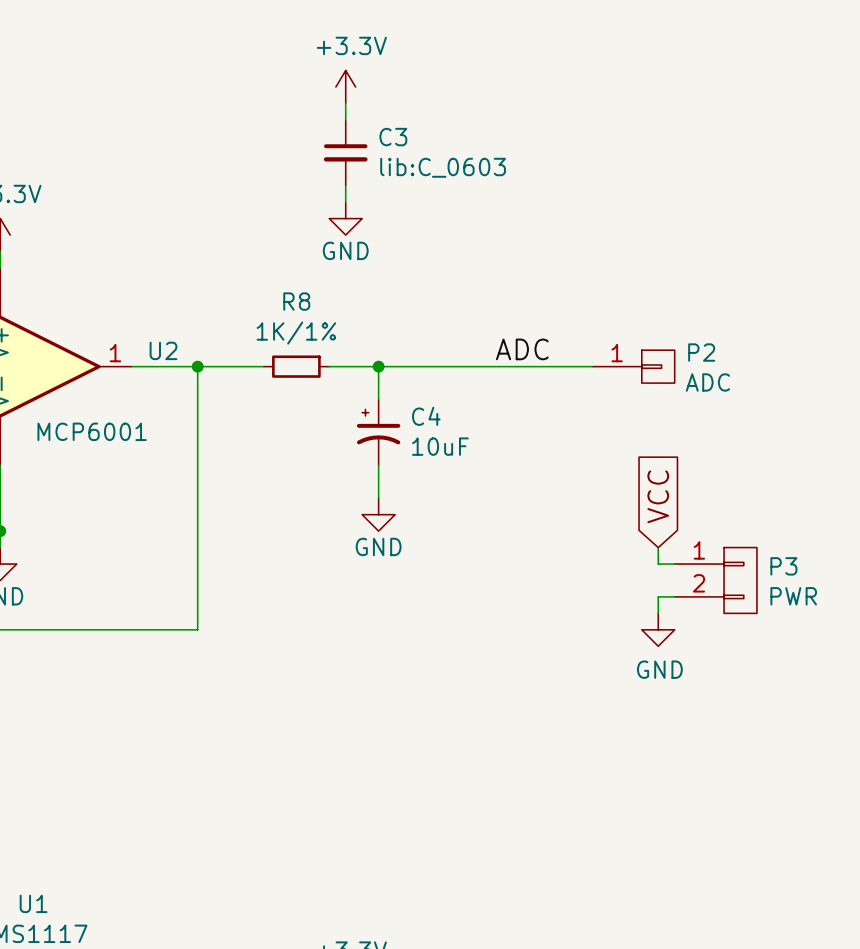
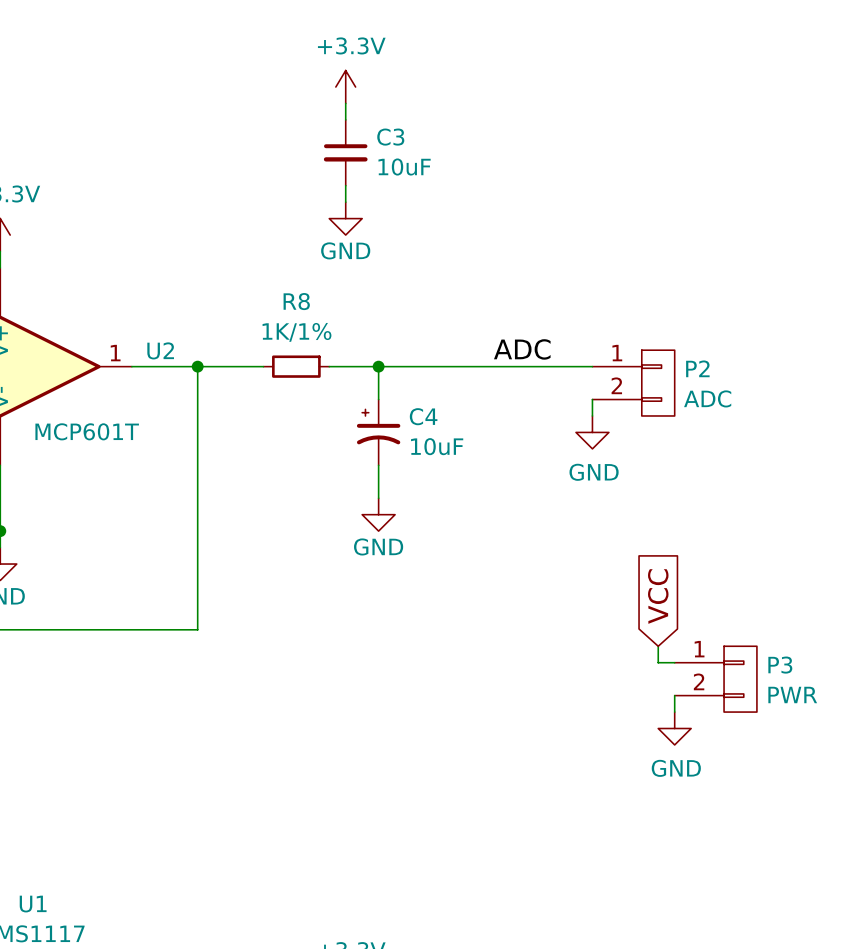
C3 value: lib:C_0603 (443, 167) -> 10uF (404, 167)
P2 symbol: [592, 350, 675, 384] -> [592, 350, 675, 416]
wire: none -> (592, 399) (592, 415)
U2 value: MCP6001 (92, 431) -> MCP601T (87, 431)
power symbol: none -> GND (592, 432)
global label position: VCC (658, 496) -> VCC (658, 596)
wire: (658, 547) (658, 564) (674, 564) -> (658, 646) (658, 662) (674, 662)
P3 position: (715, 580) -> (715, 679)
wire: (674, 596) (658, 596) (658, 613) -> none
power symbol position: GND (658, 629) -> GND (674, 728)
wire: none -> (674, 695) (674, 712)

